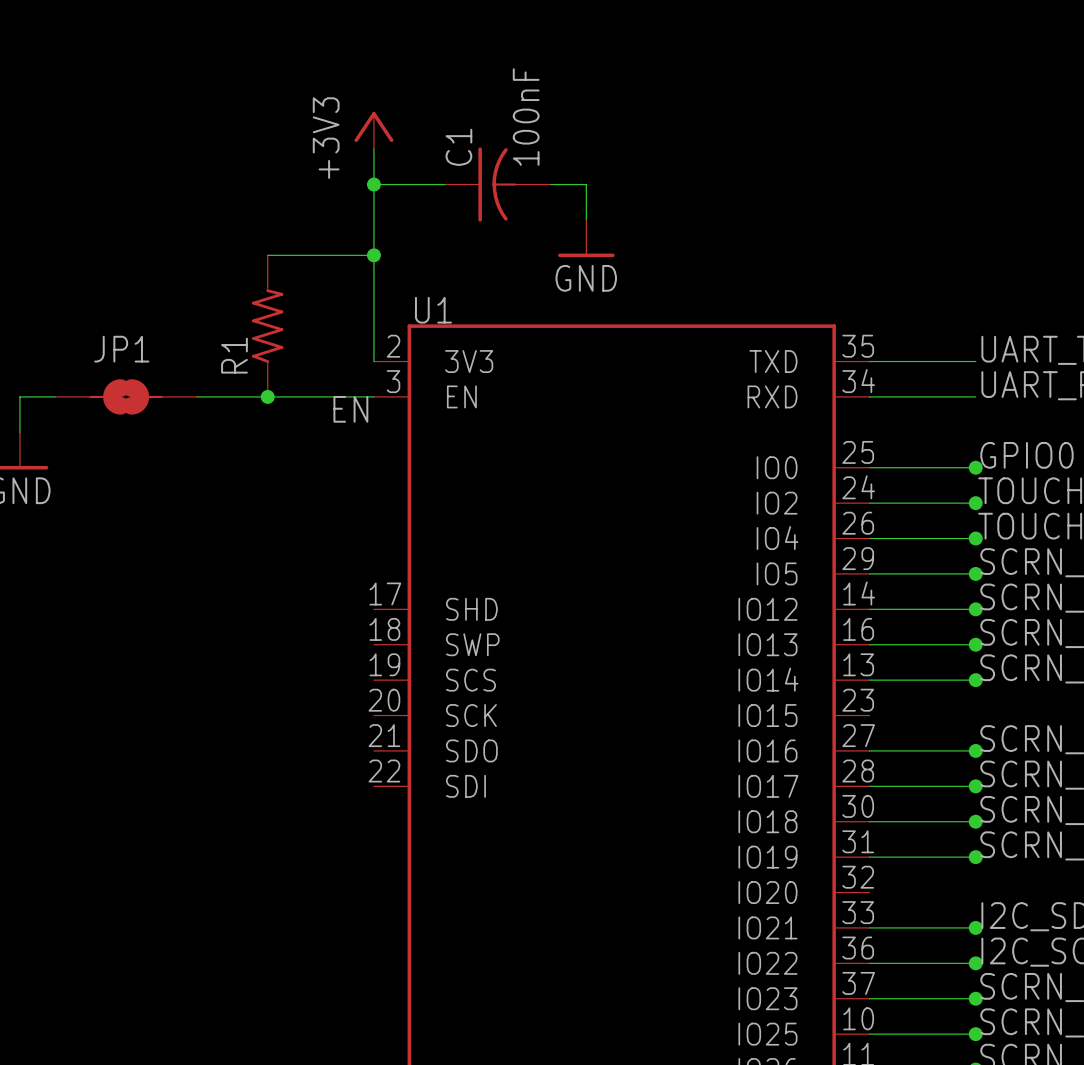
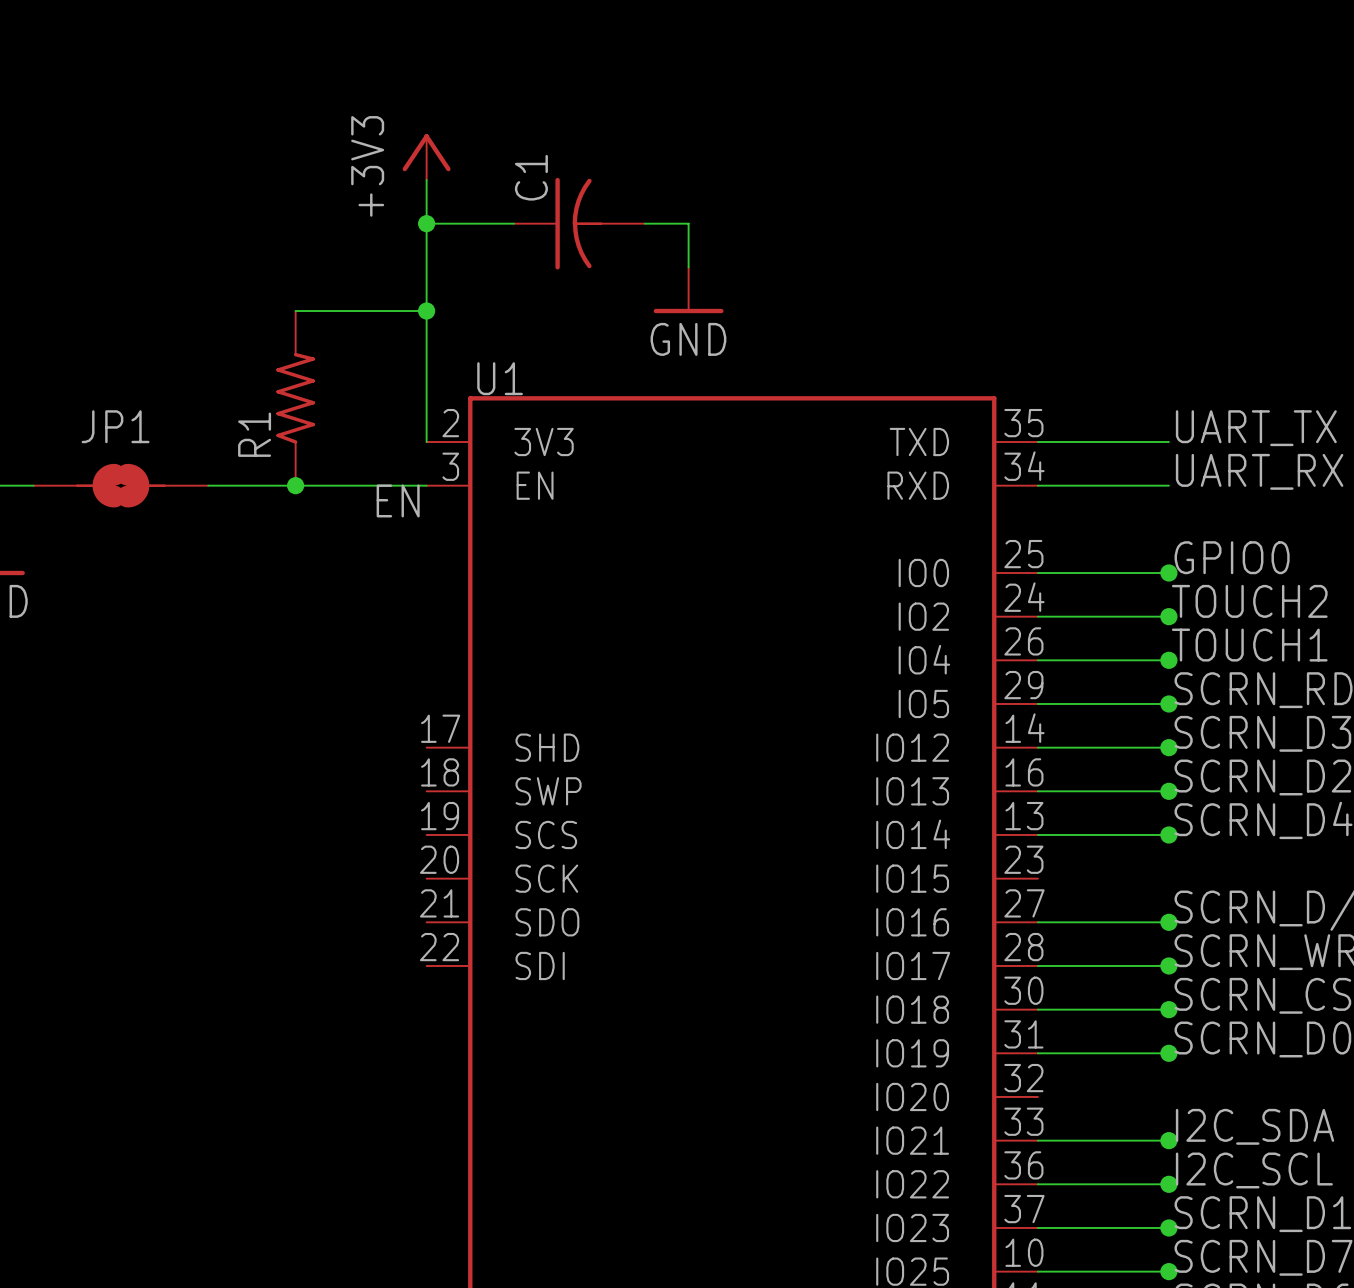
C1 value: 100nF (526, 117) -> none

